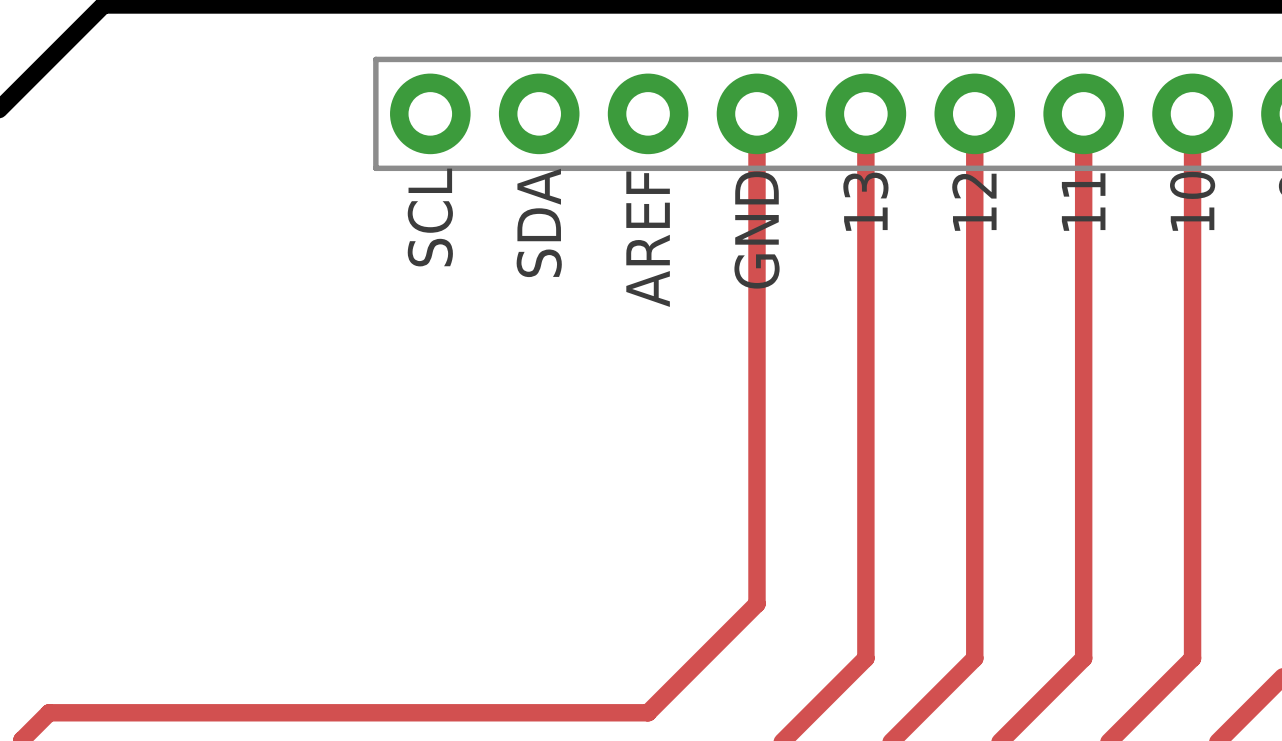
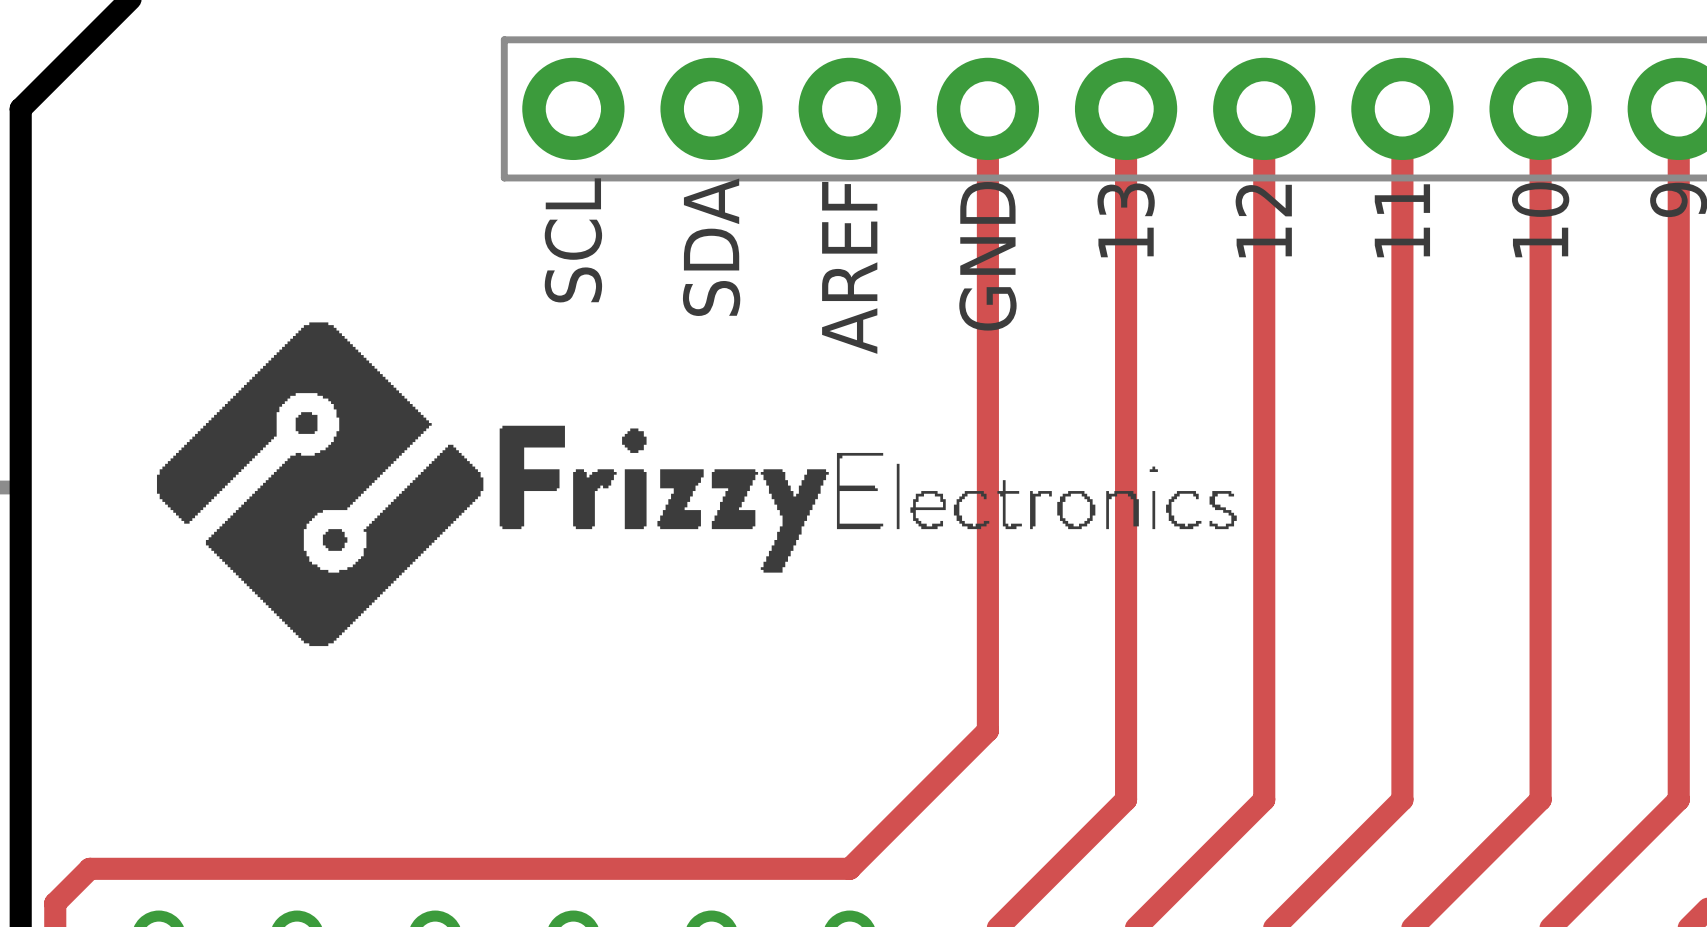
drawing: none -> [156, 322, 1237, 647]

